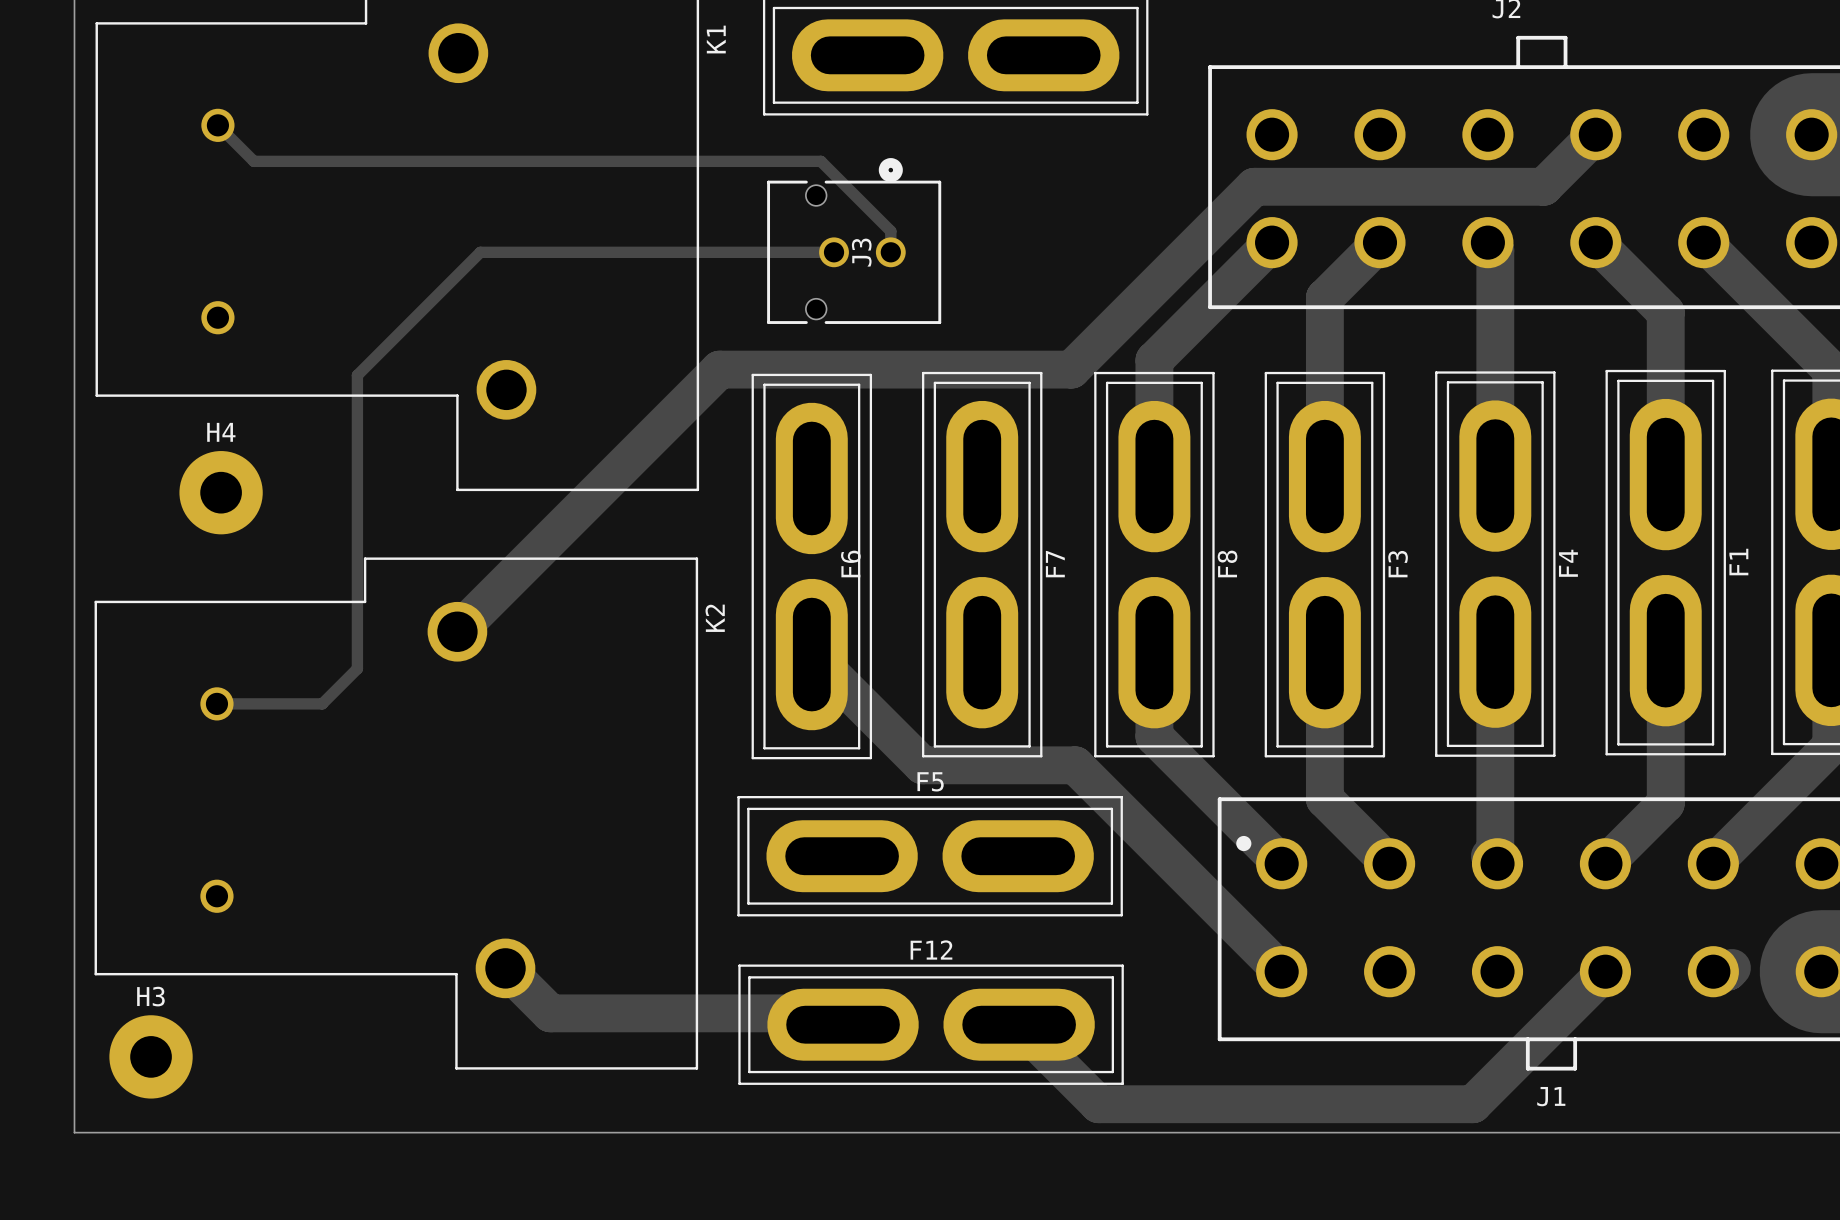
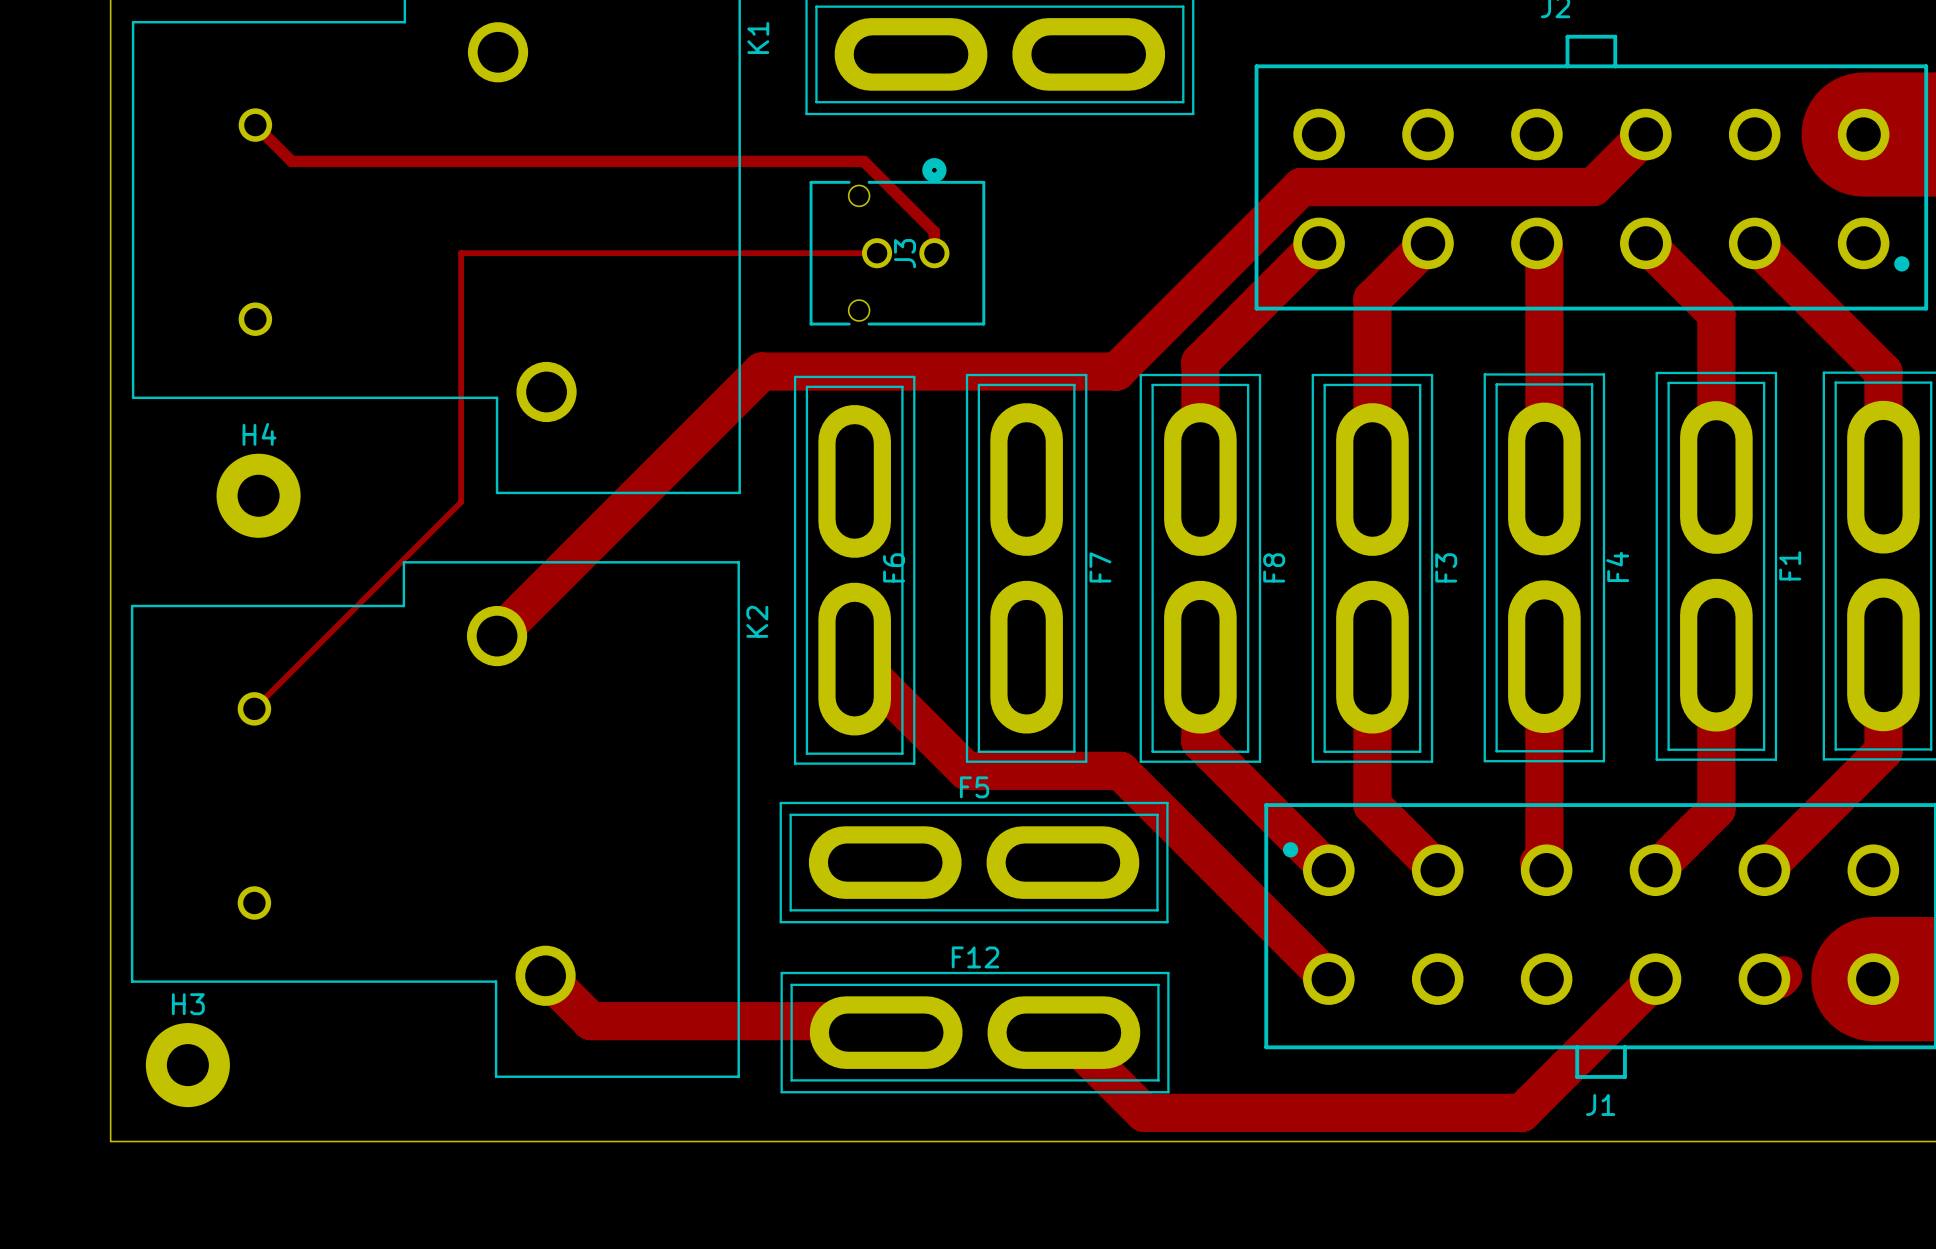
track: (480, 252) (357, 375) (357, 668) (322, 703) (216, 703) -> (520, 253) (461, 253) (461, 502) (254, 708)
track width: thick (480, 252) (834, 252) -> thin (520, 253) (877, 253)

